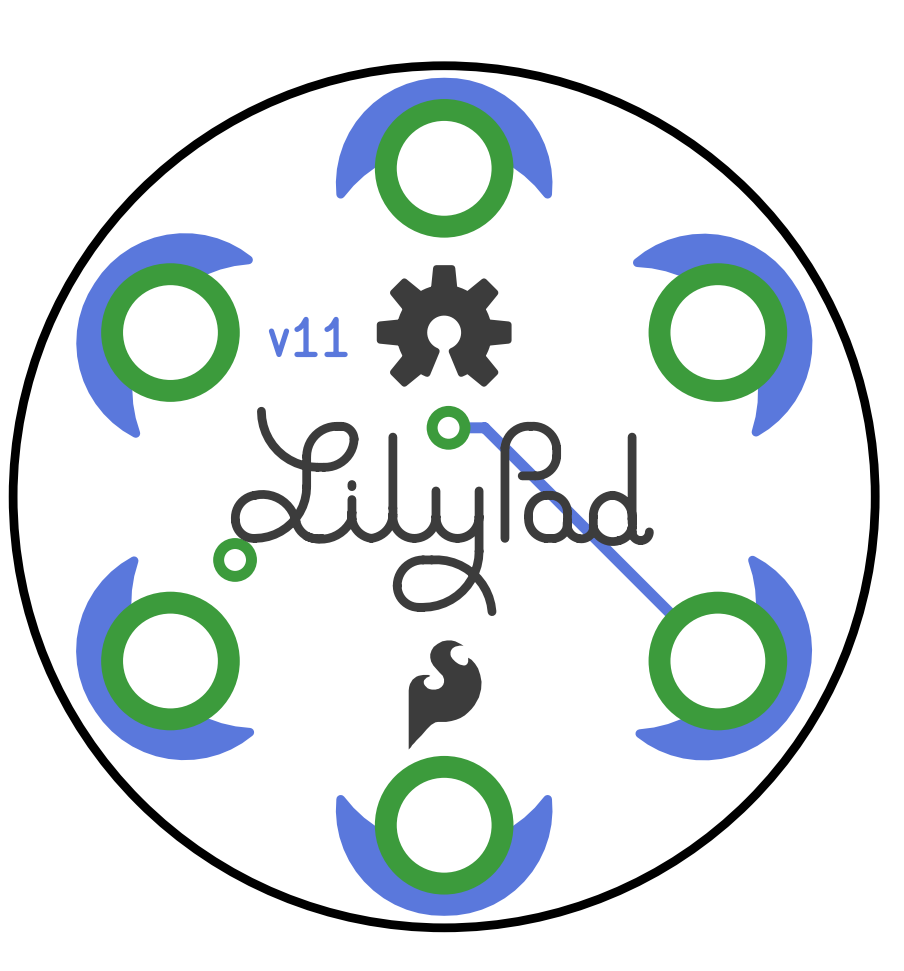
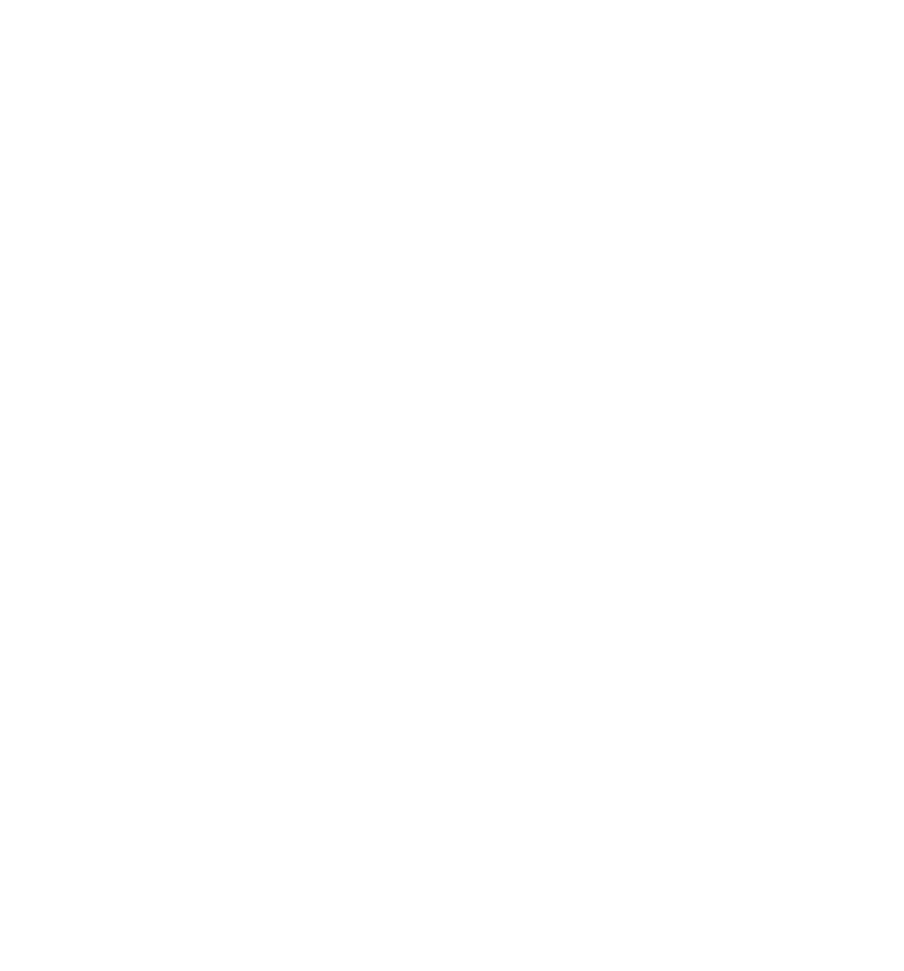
round board edge: [8, 61, 880, 933] -> none
part: (444, 157) -> none
drawing: [230, 265, 654, 750] -> none
part: (164, 335) -> none
part: (722, 335) -> none
text: v11 (308, 336) -> none
track: (448, 427) (484, 427) (717, 661) -> none
via: (448, 427) -> none
via: (235, 559) -> none
part: (165, 658) -> none
part: (723, 658) -> none
part: (444, 835) -> none

